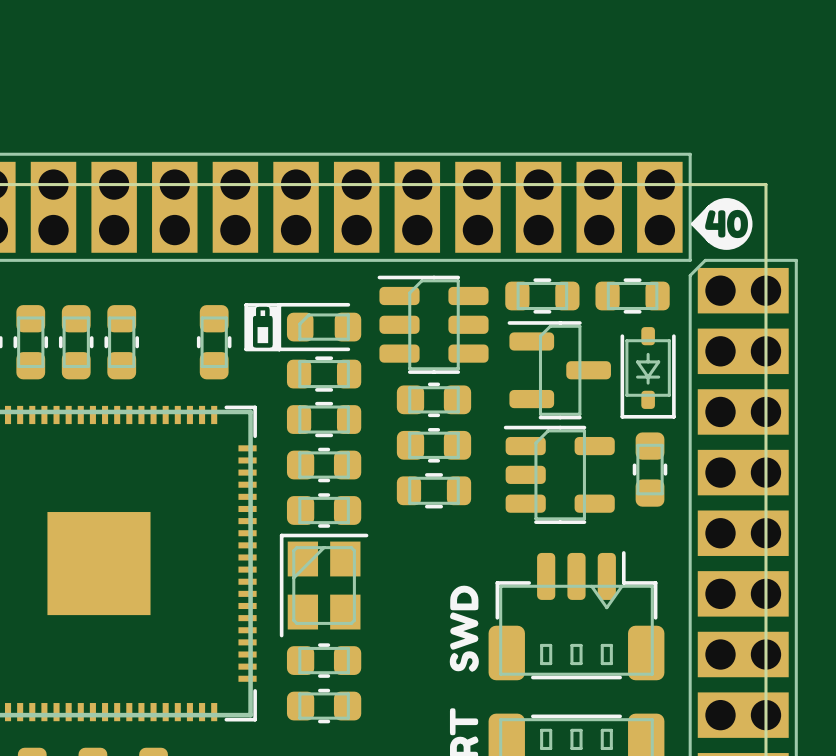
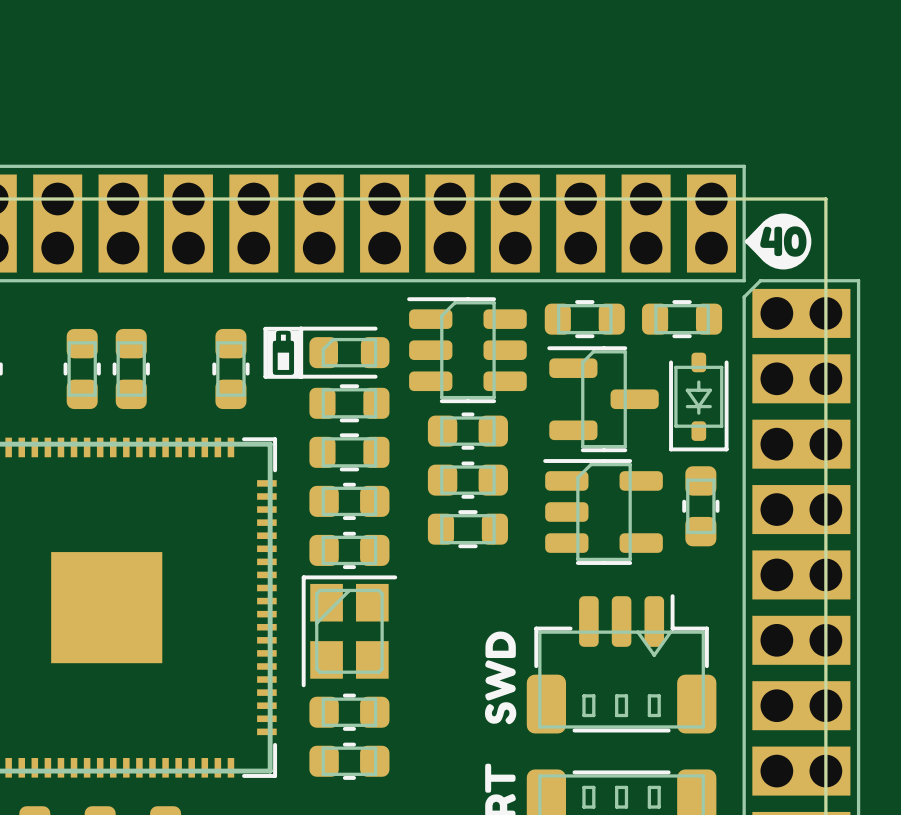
part: (30, 342) -> none

